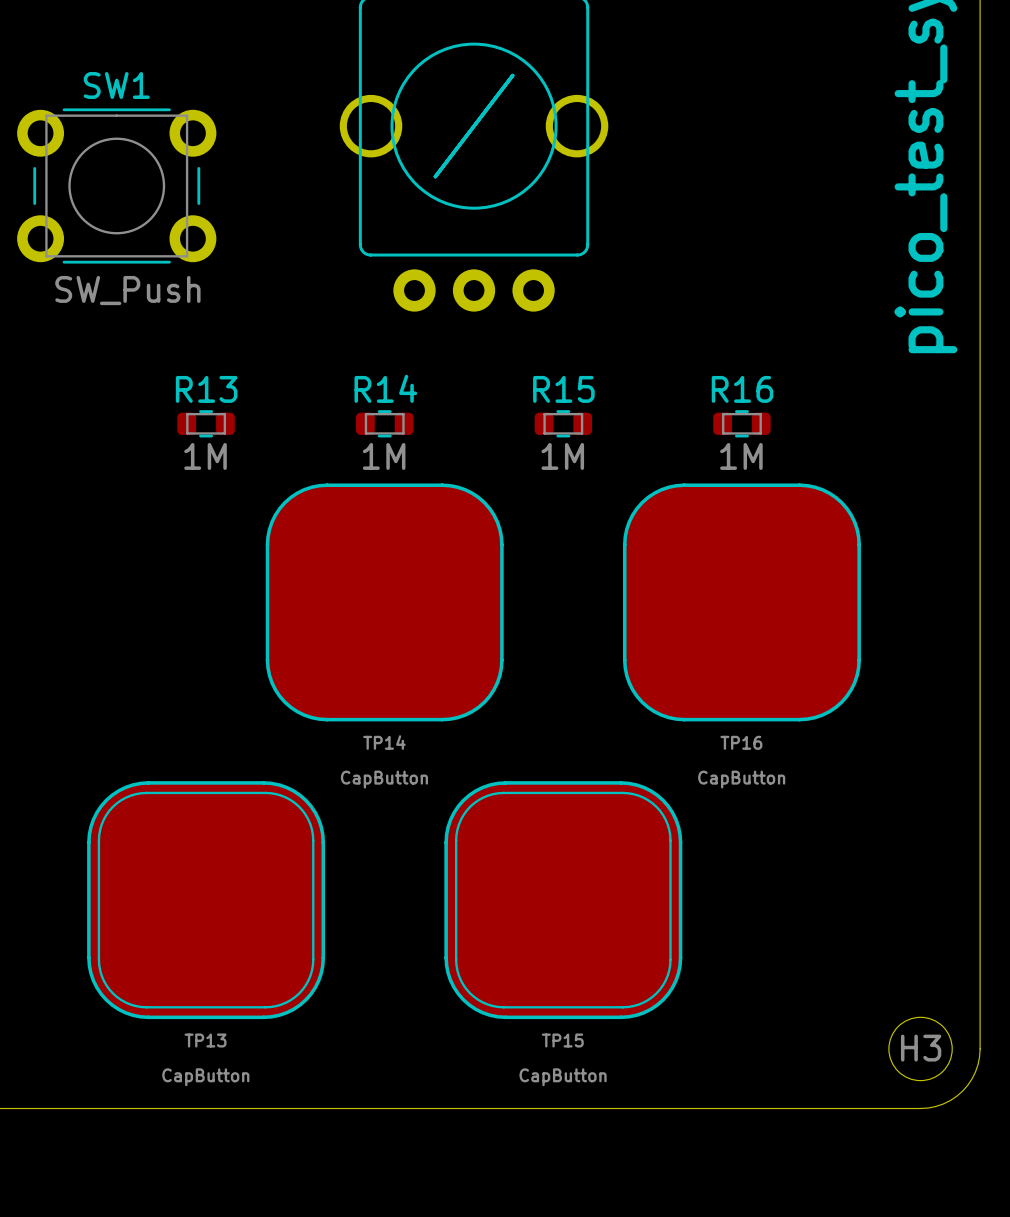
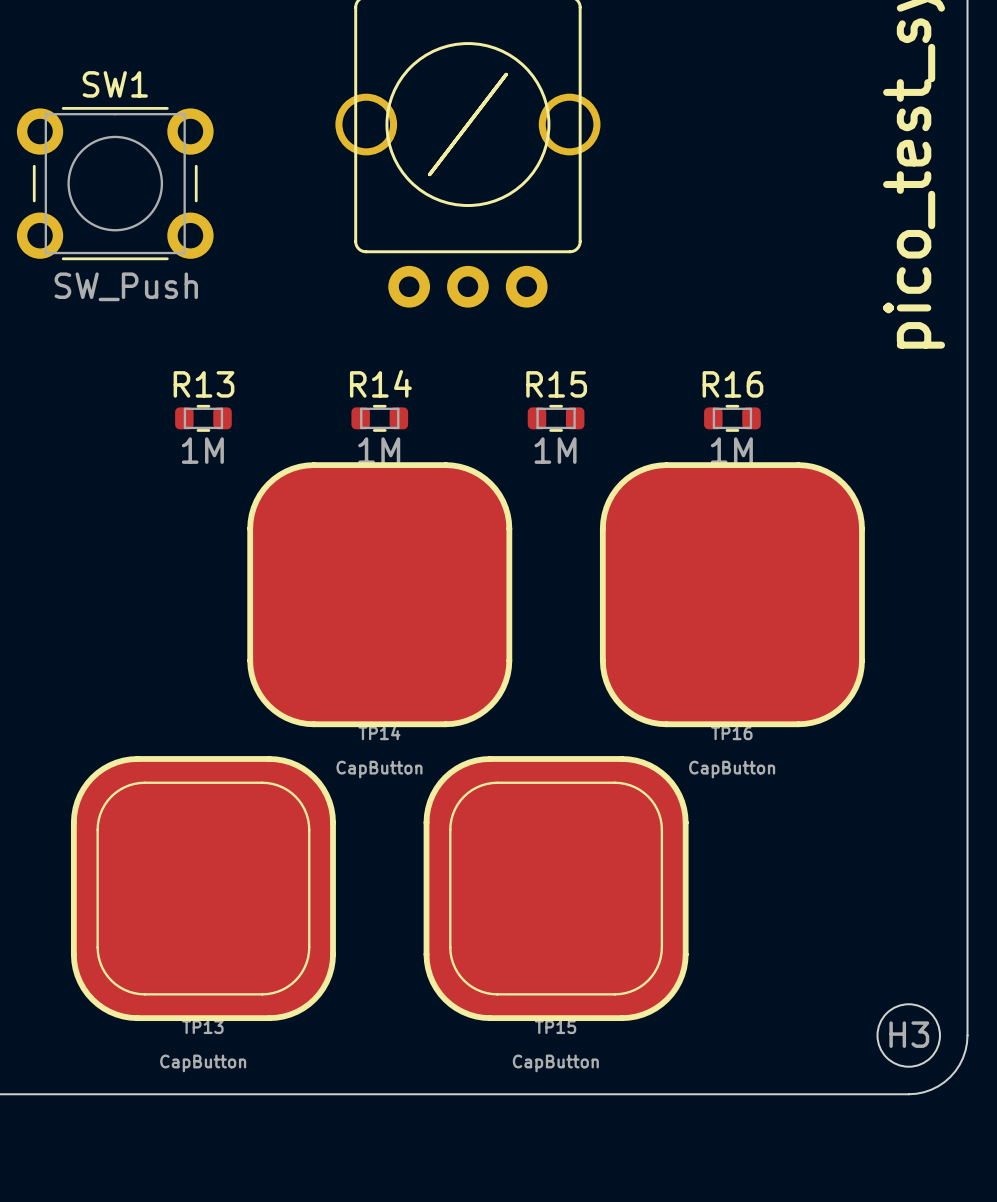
TP14 footprint: [265, 483, 504, 722] -> [247, 462, 513, 728]
TP16 footprint: [622, 483, 861, 722] -> [599, 462, 865, 728]
TP13 footprint: [87, 781, 326, 1020] -> [70, 756, 336, 1022]
TP15 footprint: [444, 781, 683, 1020] -> [423, 756, 689, 1022]

